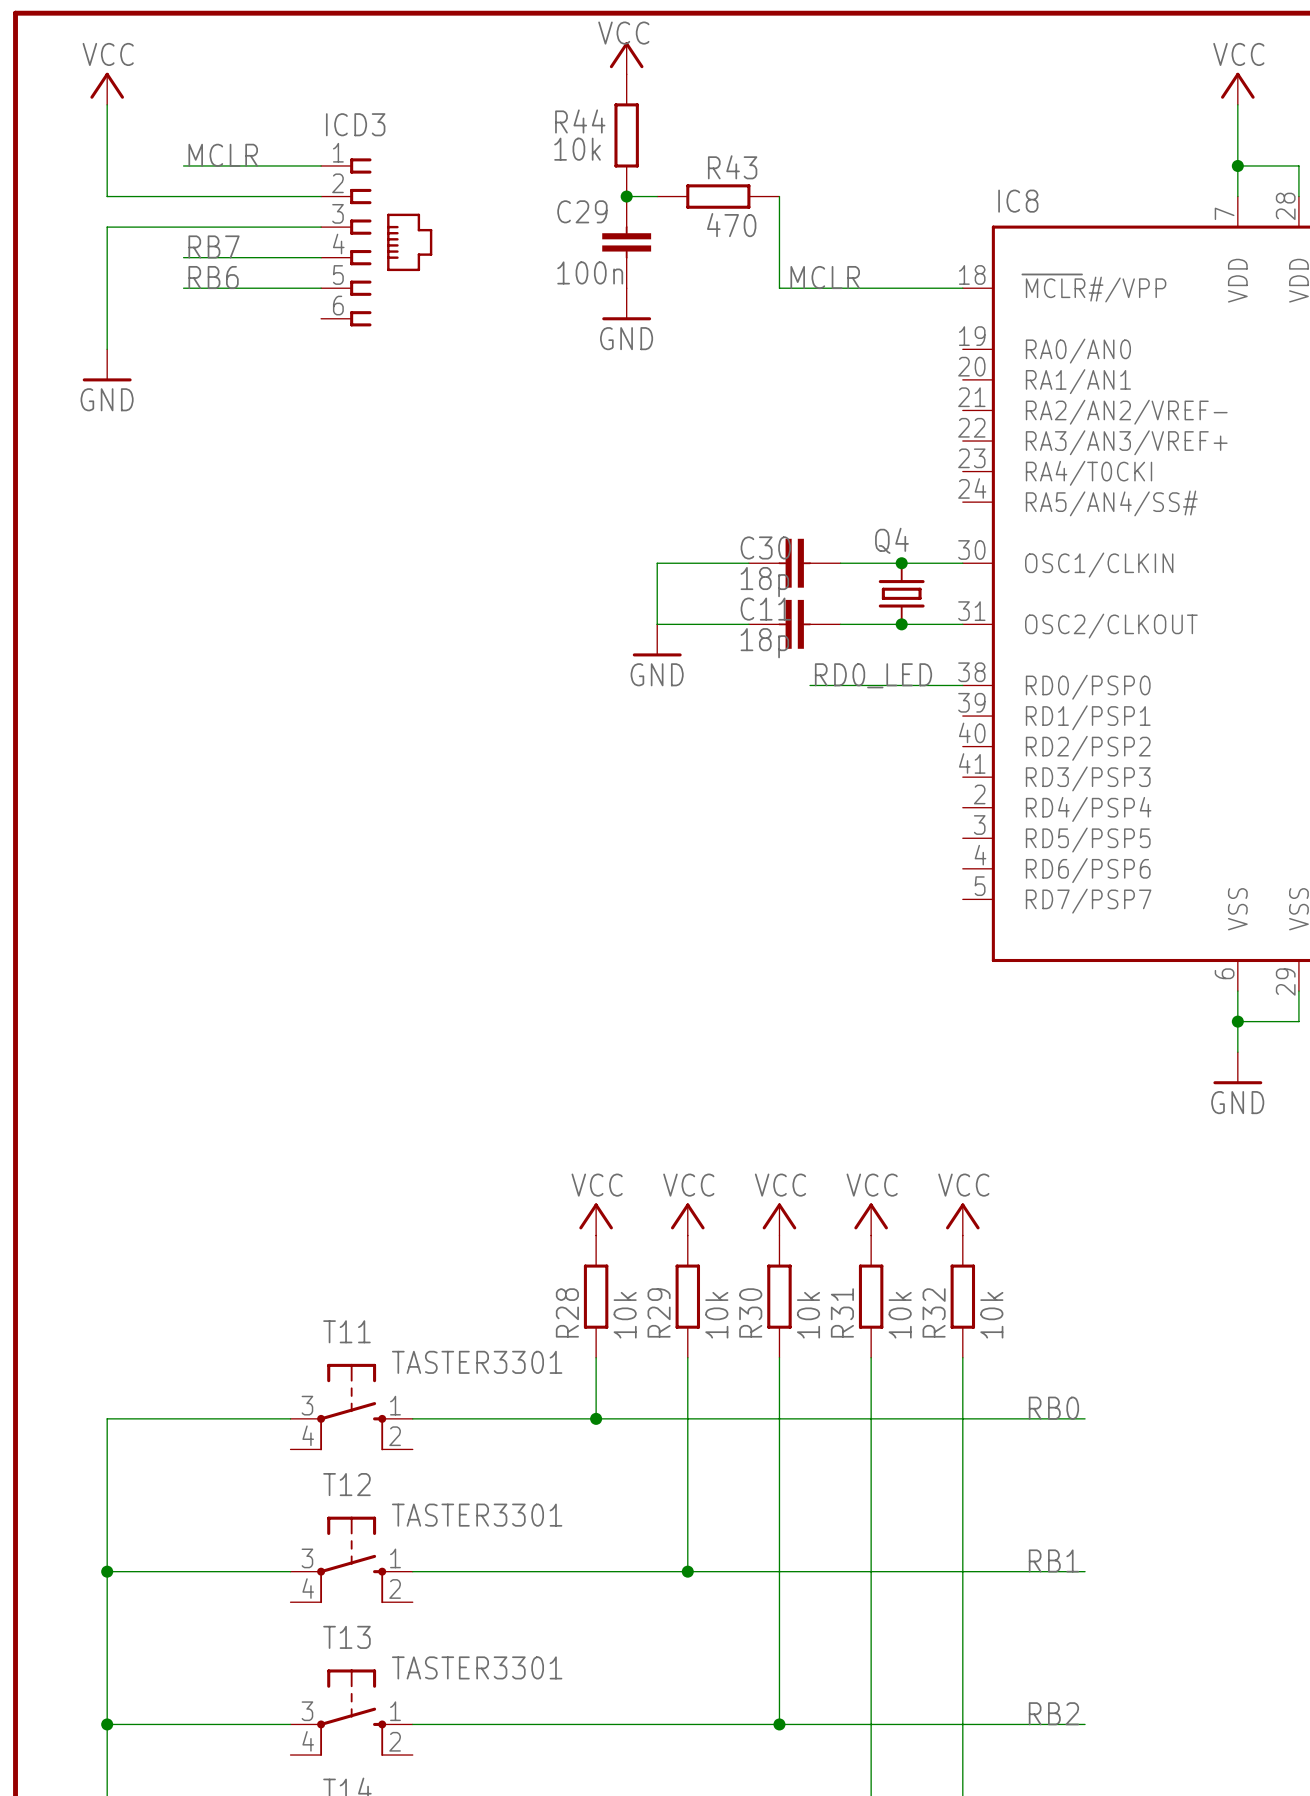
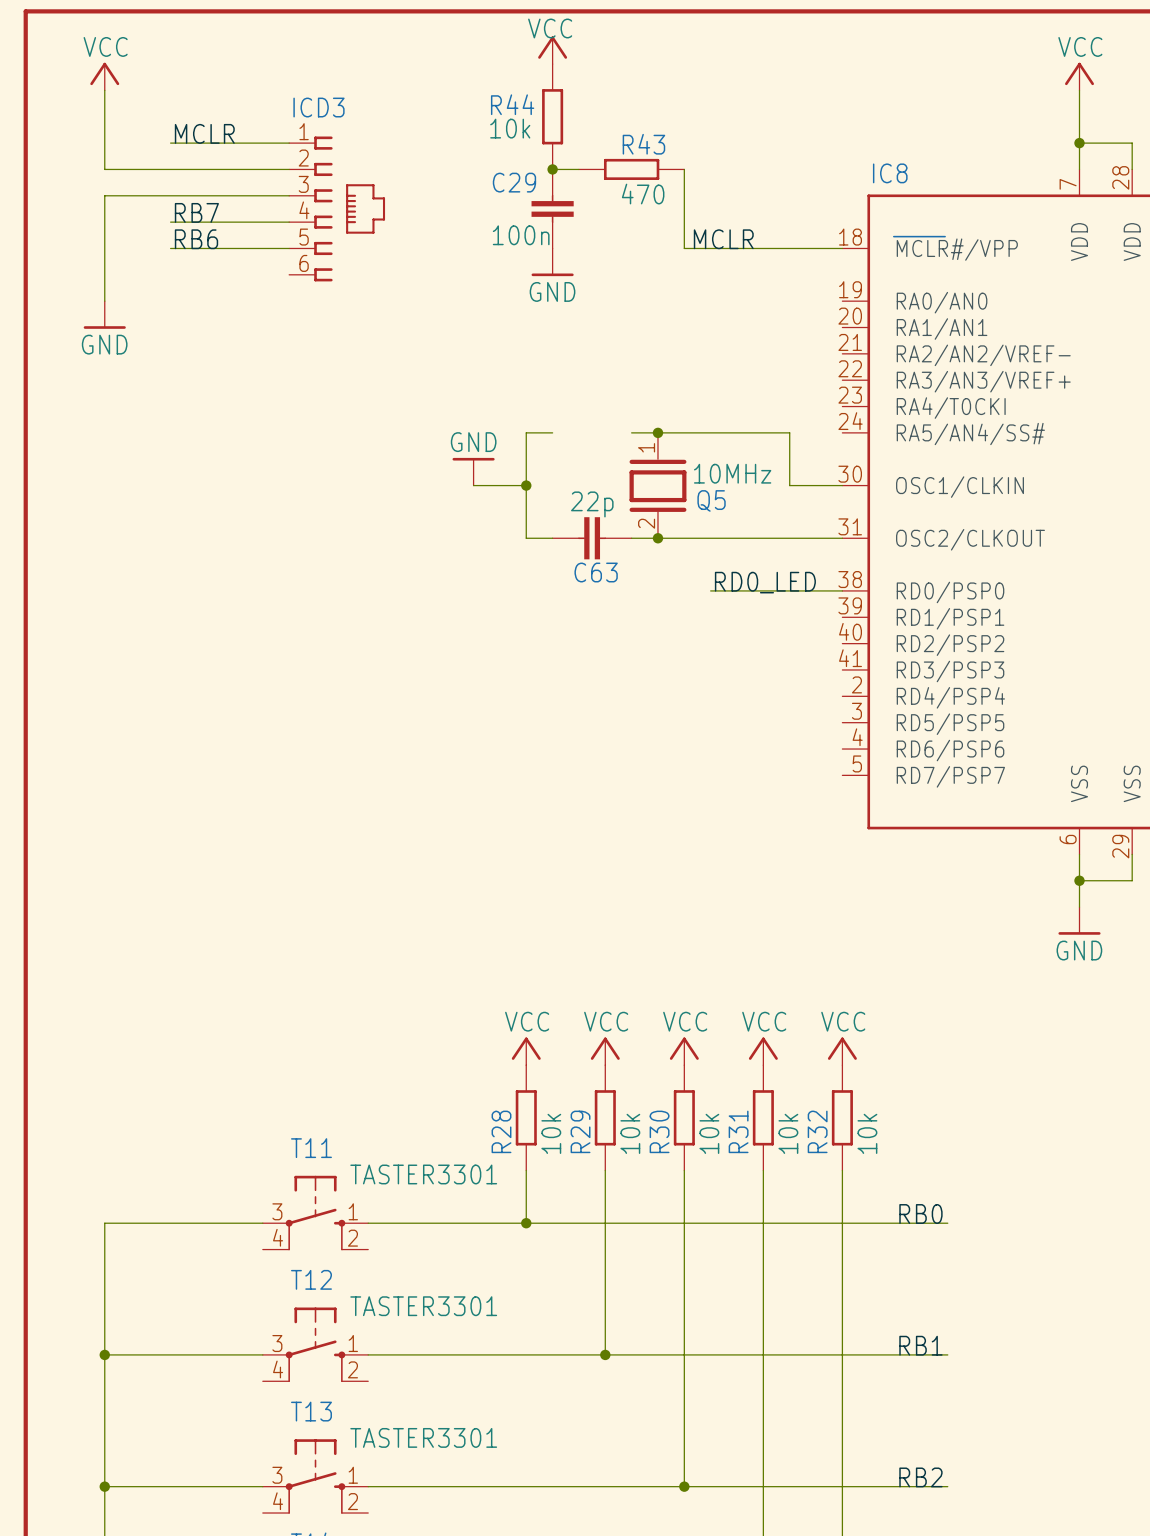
wire: none -> (552, 432) (526, 432) (526, 538) (552, 538)
junction: none -> (657, 432)
wire: none -> (473, 485) (526, 485)
junction: none -> (526, 485)
wire: (748, 563) (657, 563) (657, 624) (718, 624) -> none
Q5: none -> 10MHz (657, 485)
C30: 18p (794, 563) -> none
wire: (840, 563) (901, 563) -> (631, 432) (789, 432) (789, 485)
junction: (901, 563) -> none
Q4: (901, 593) -> none
C63: none -> 22p (592, 538)
junction: none -> (657, 538)
C11: 18p (794, 624) -> none
junction: (901, 624) -> none
power symbol position: GND (657, 640) -> GND (473, 471)
power symbol rotation: 0° (657, 654) -> 180° (473, 459)

